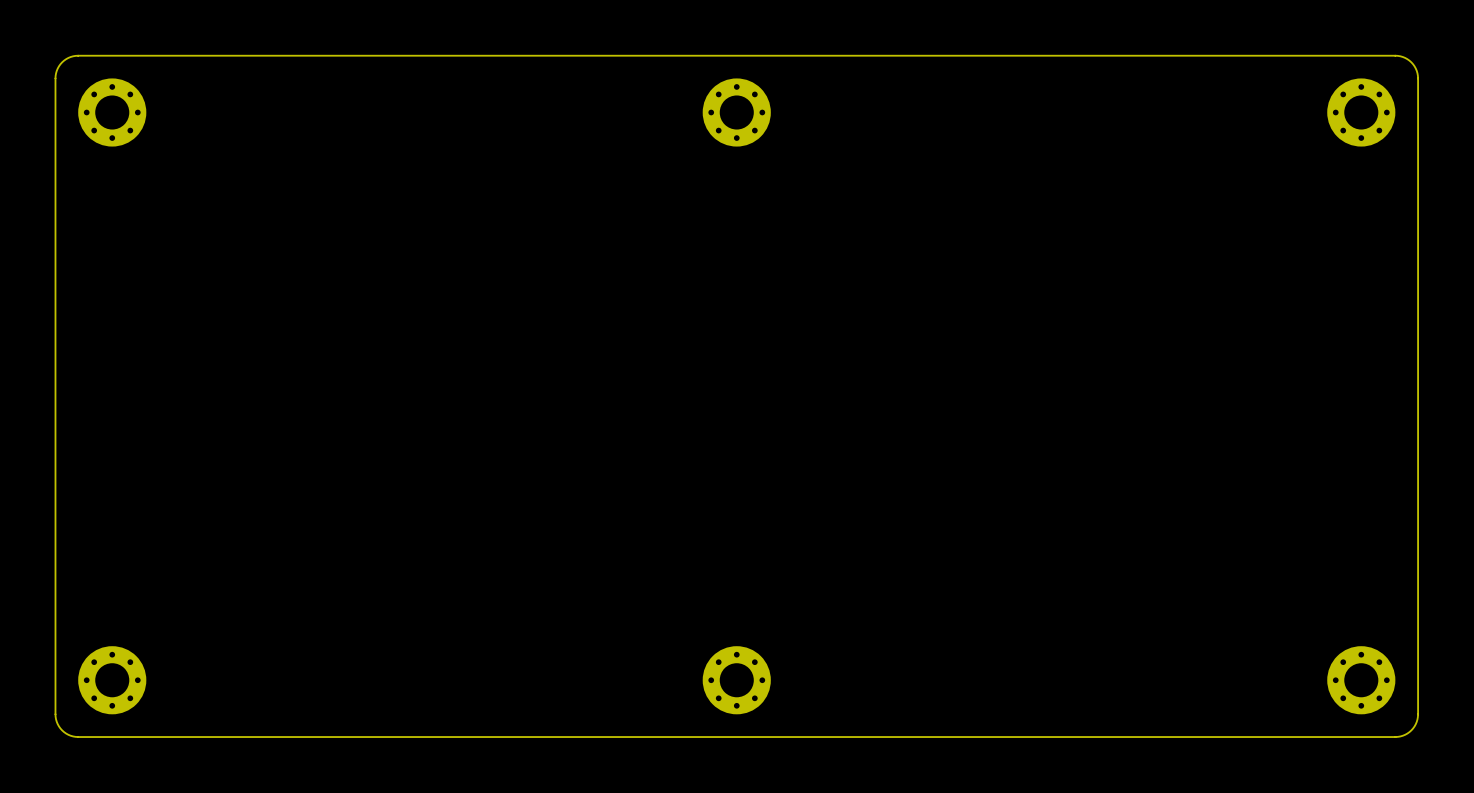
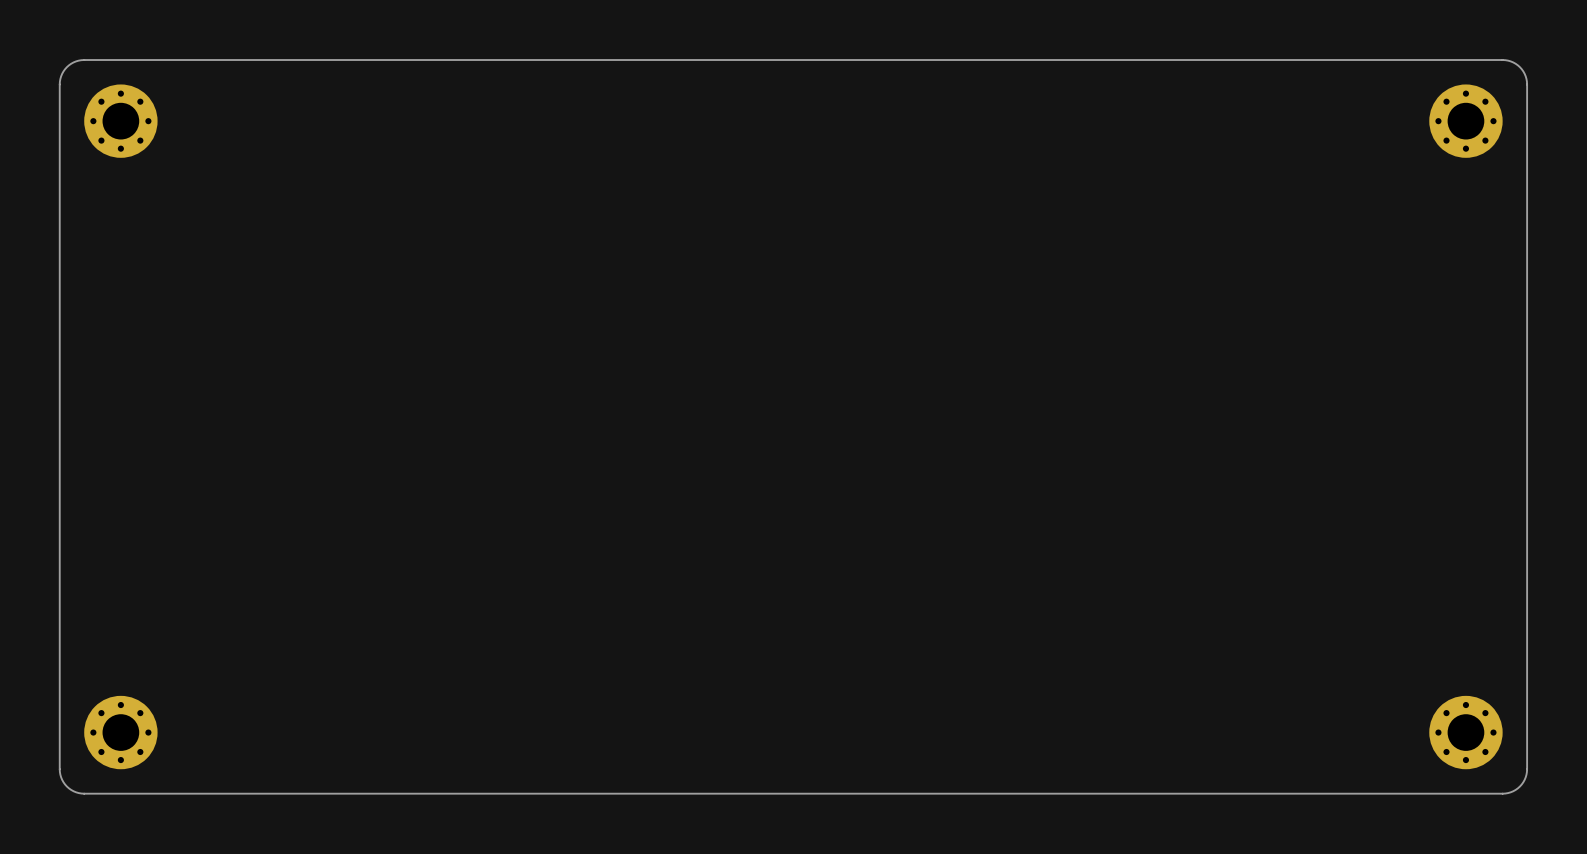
part: (736, 112) -> none
part: (736, 680) -> none

